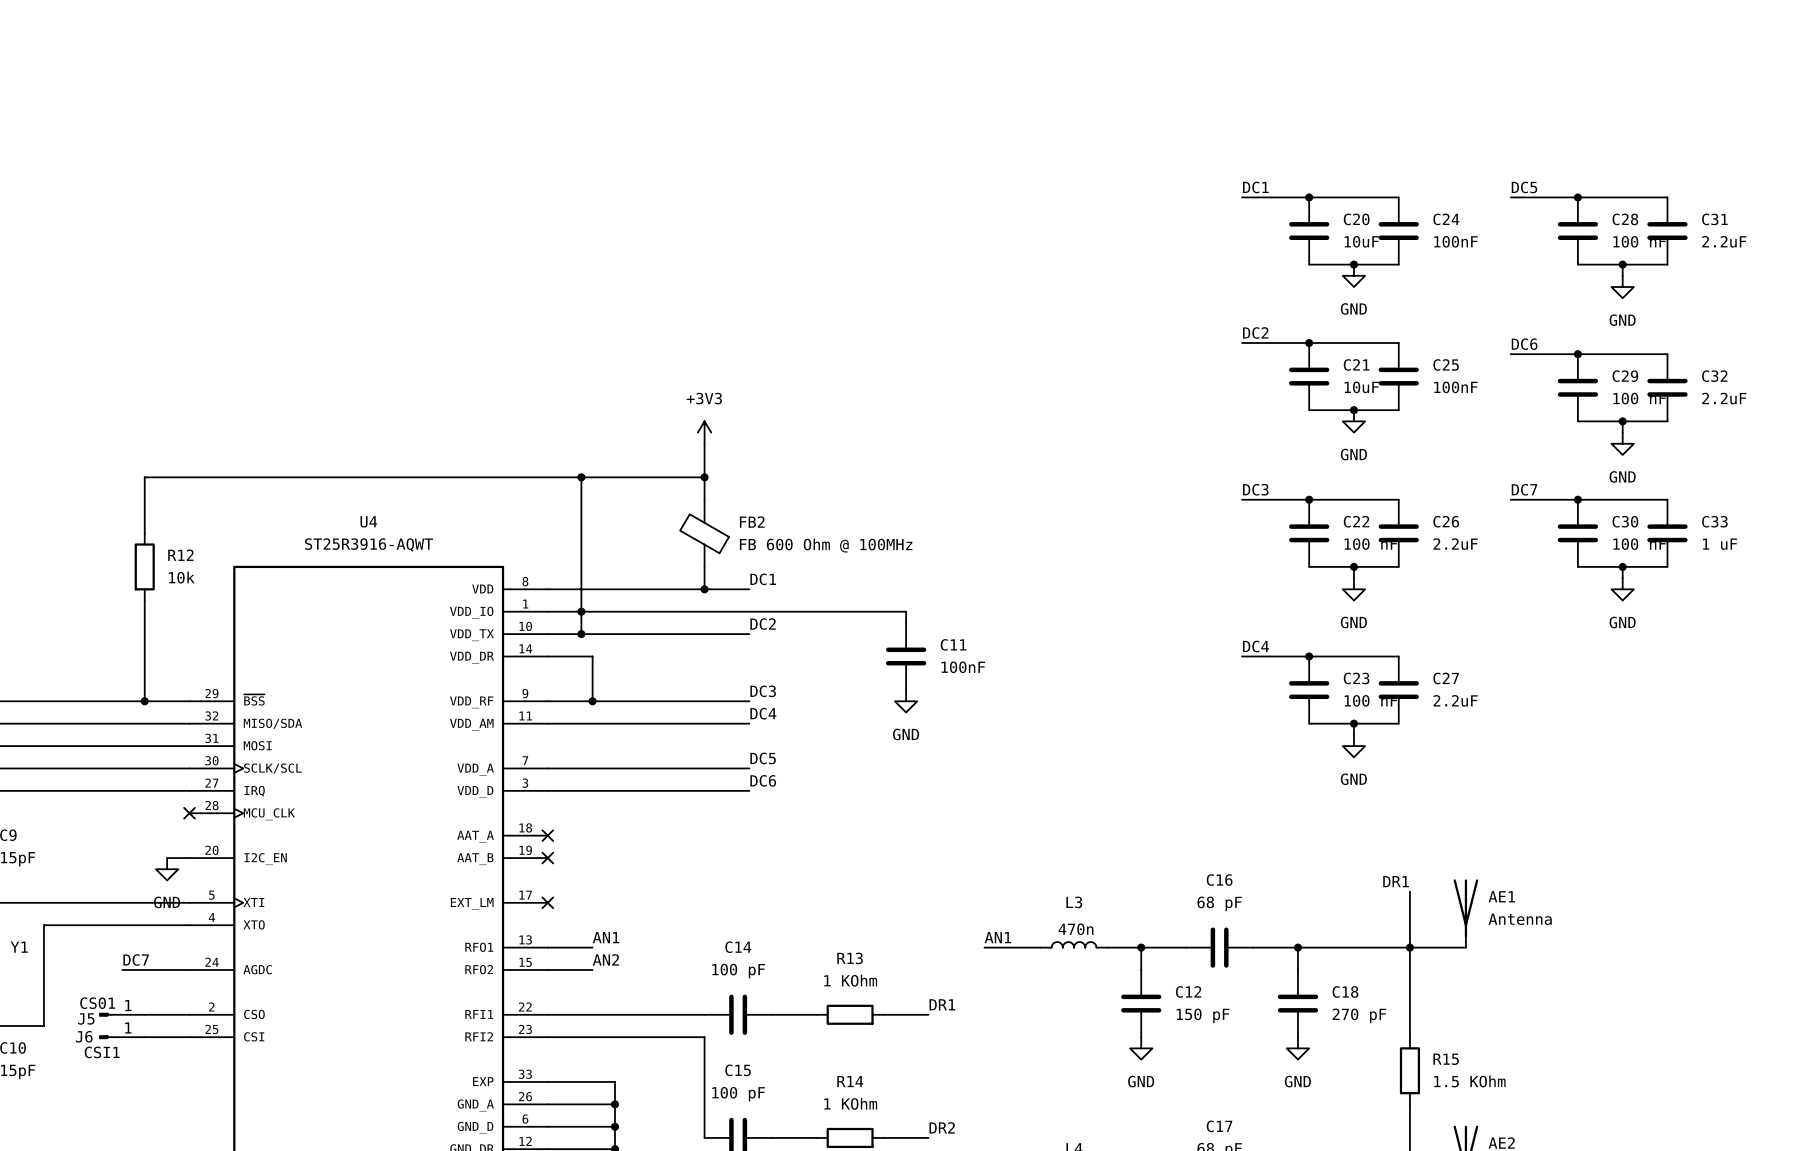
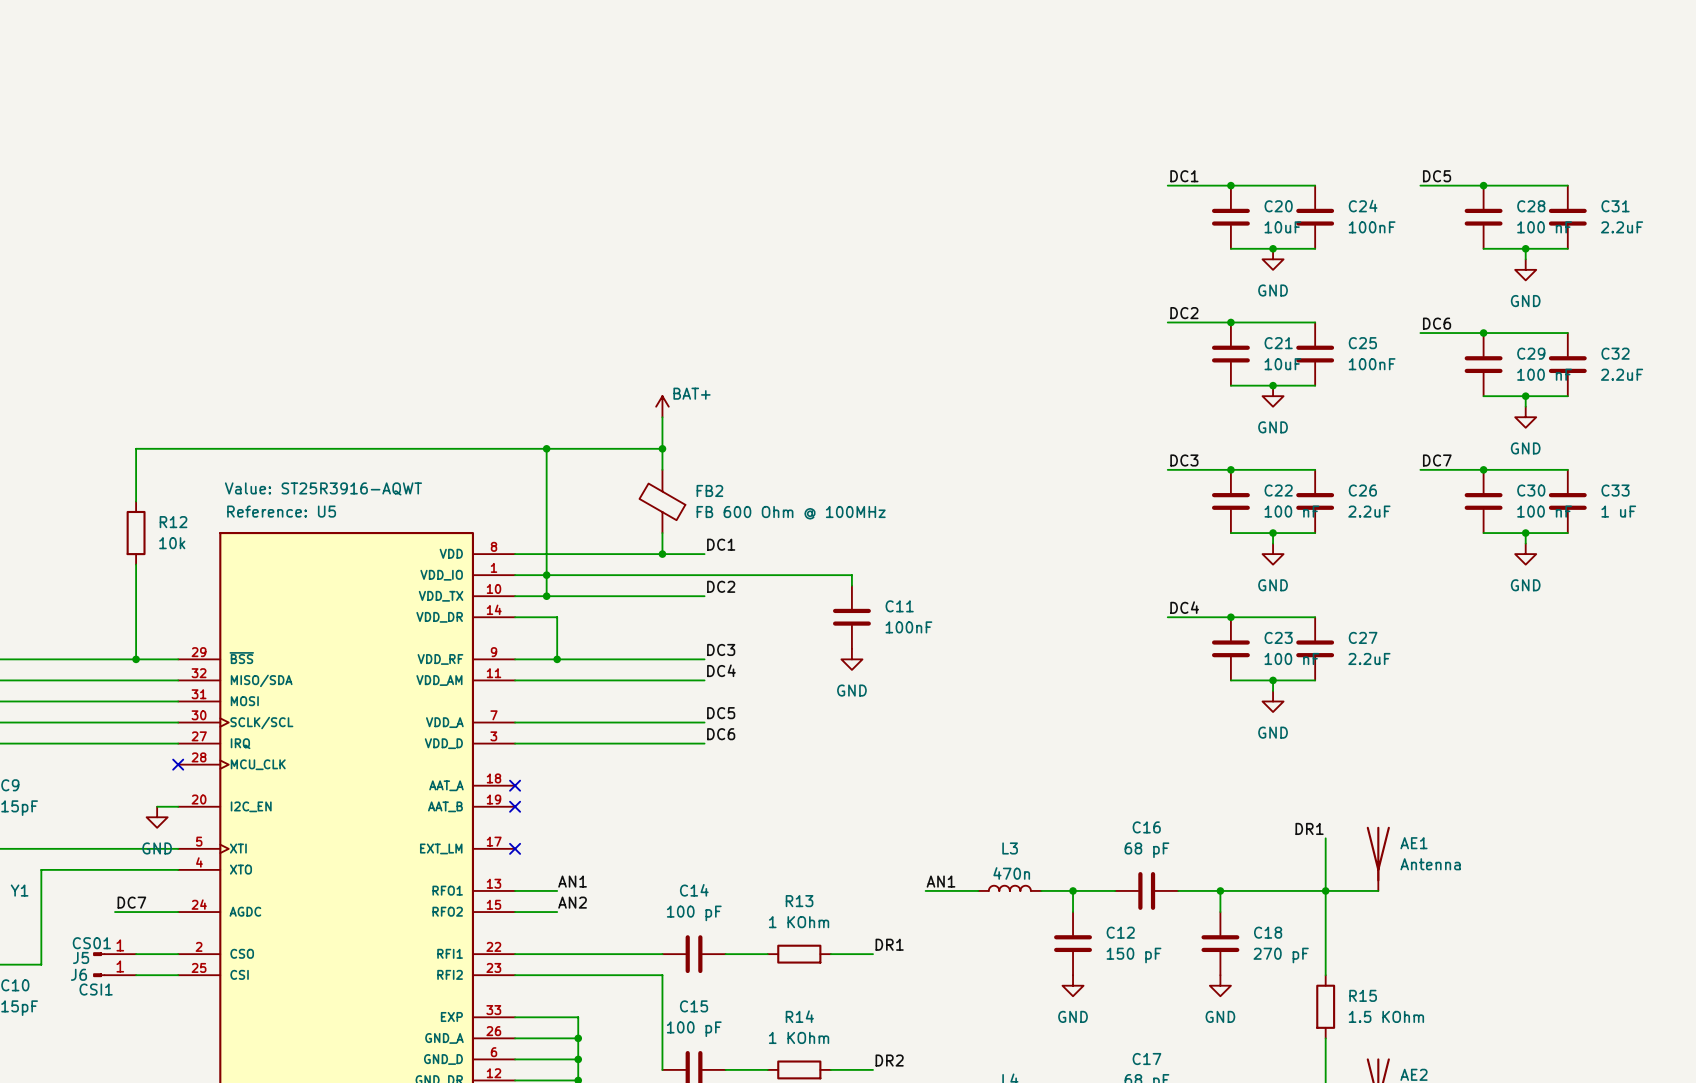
power symbol: +3V3 (704, 432) -> BAT+ (662, 406)
U4 name: U4 (368, 521) -> Reference: U5 (281, 511)
U4 value: ST25R3916-AQWT (369, 545) -> Value: ST25R3916-AQWT (323, 488)

